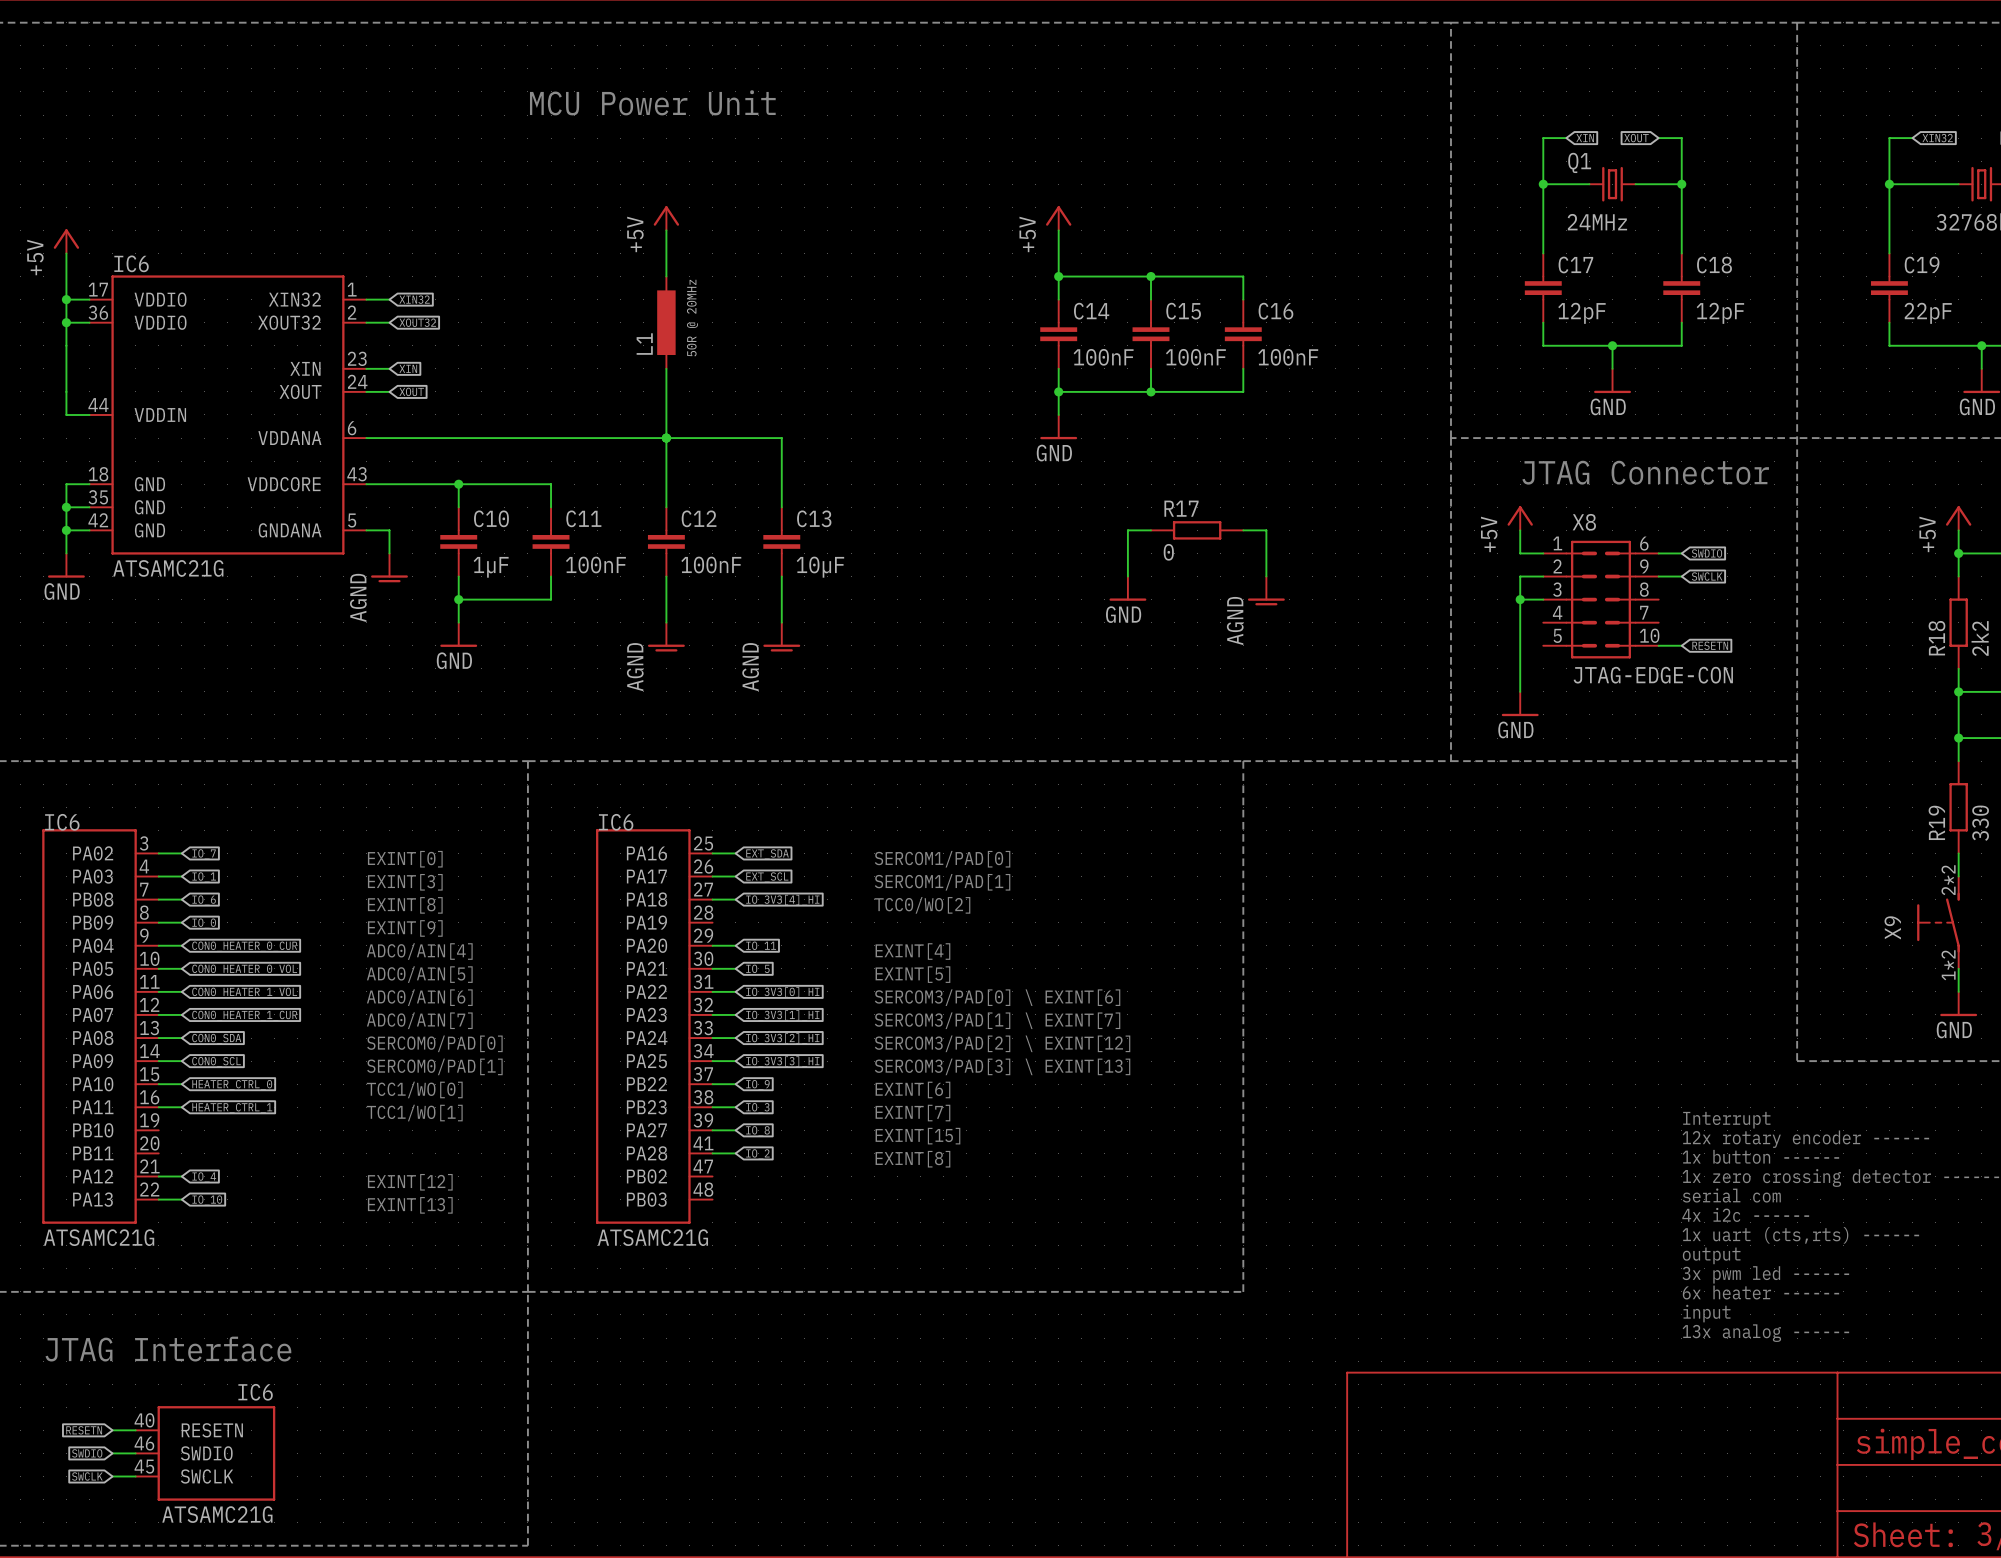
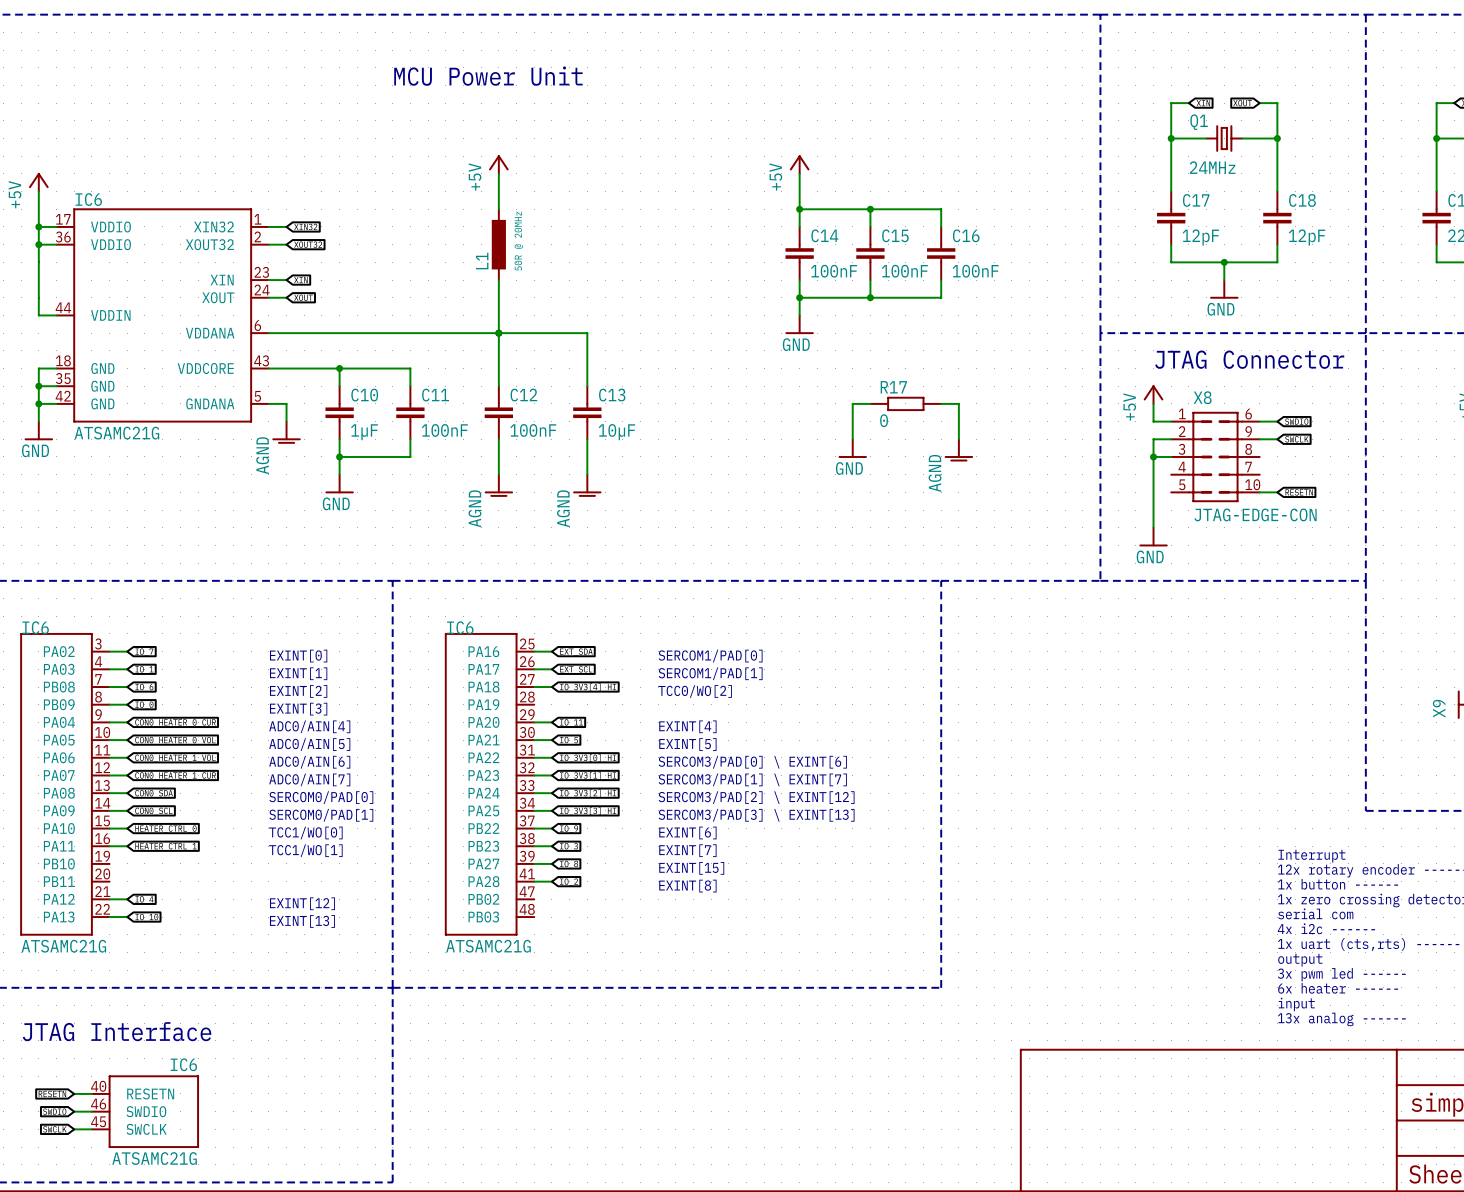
text: EXINT[3] (405, 882) -> EXINT[1] (298, 673)
text: EXINT[8] (405, 905) -> EXINT[2] (298, 691)
text: EXINT[9] (405, 928) -> EXINT[3] (298, 709)

